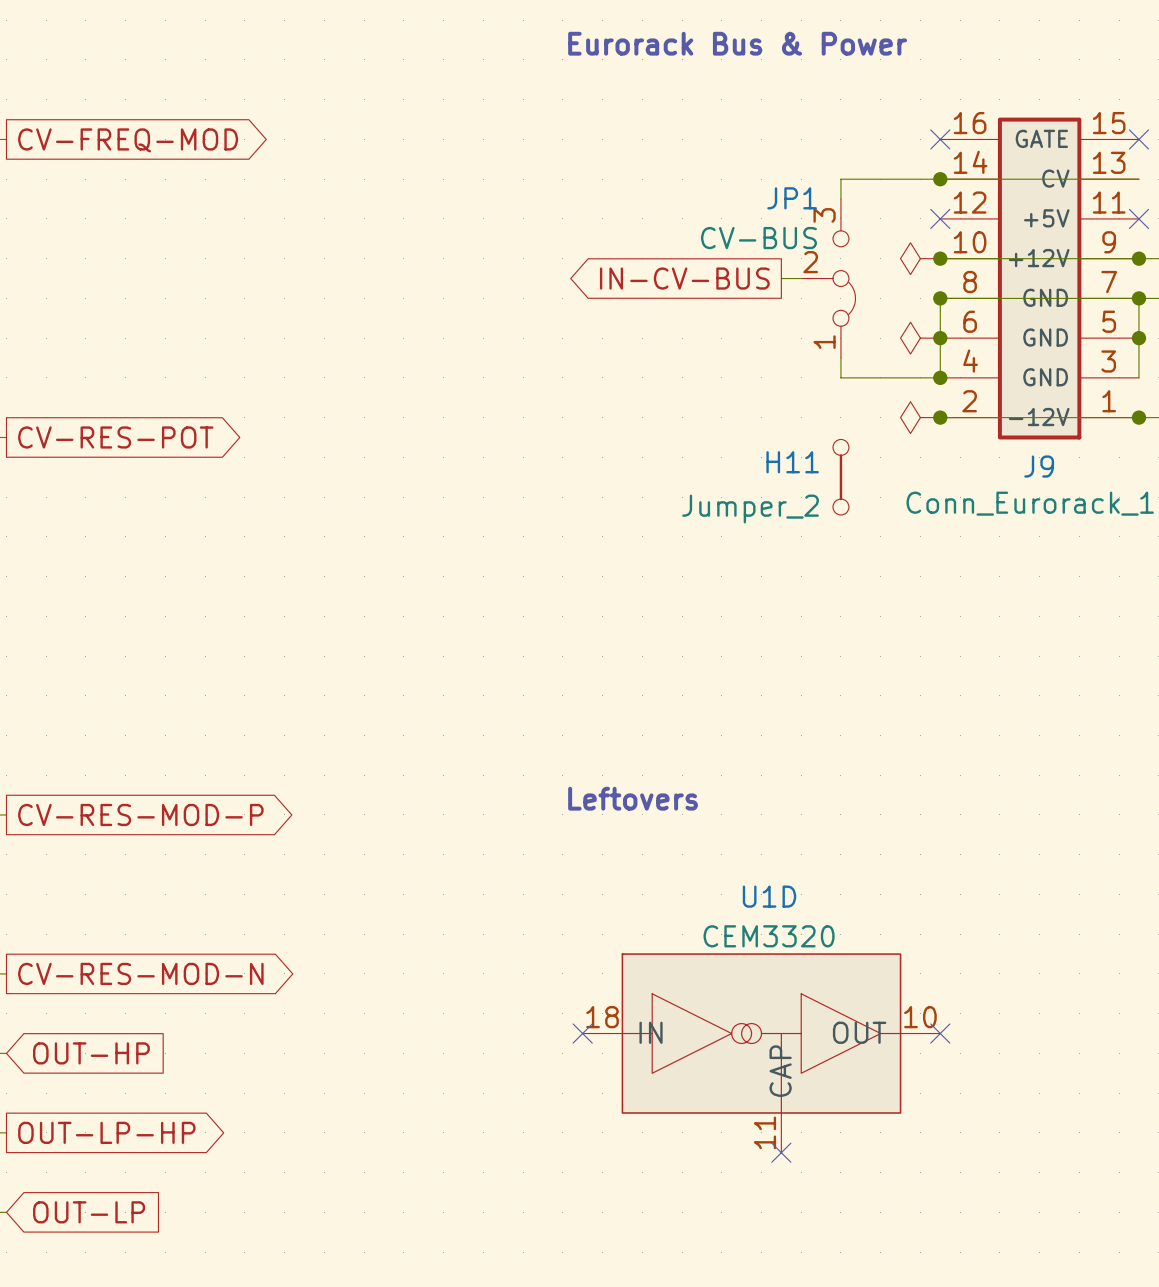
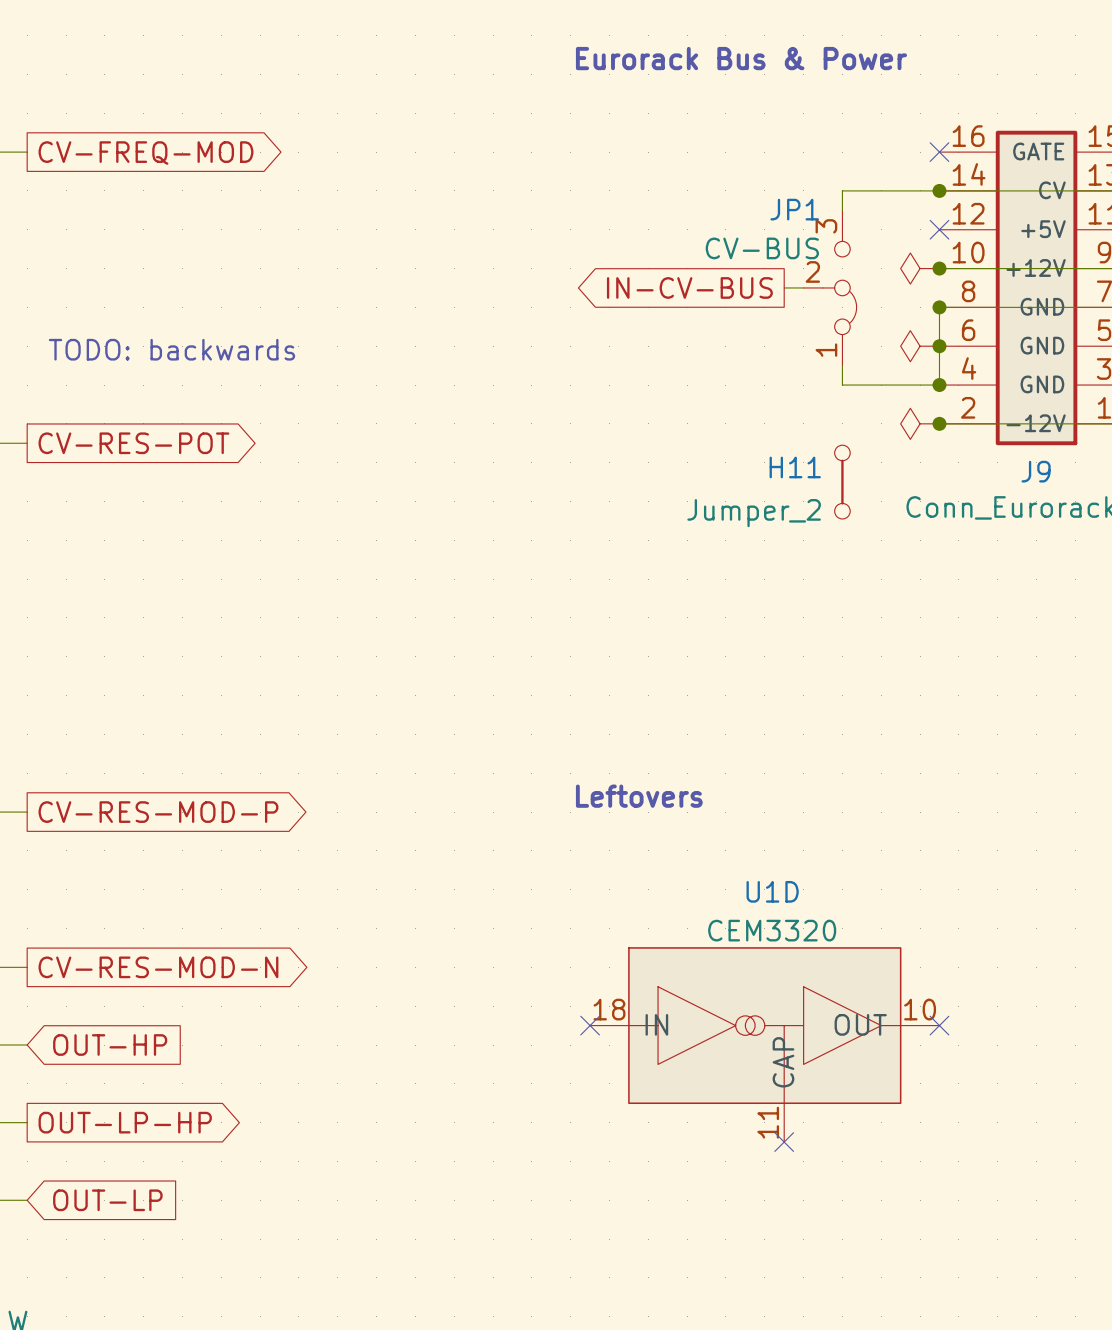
text: none -> TODO: backwards (171, 349)

